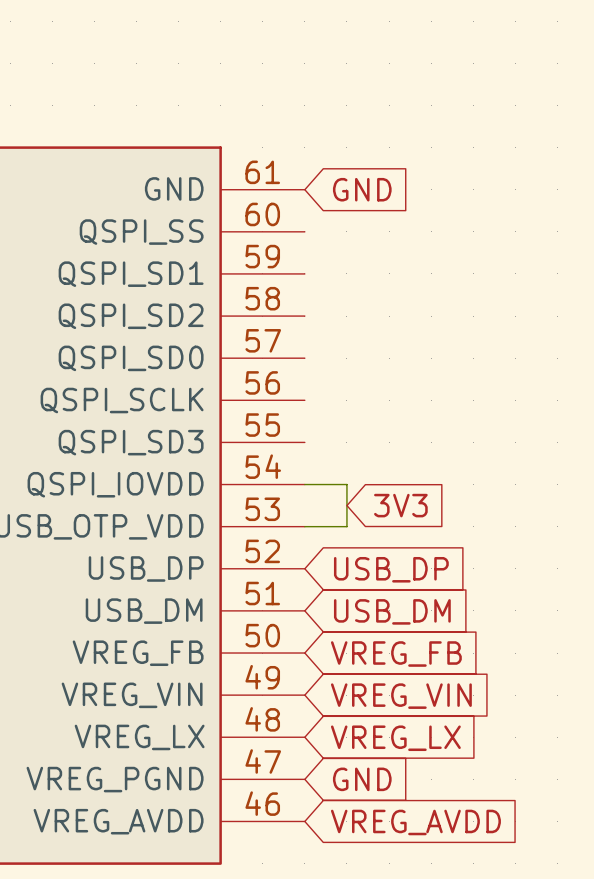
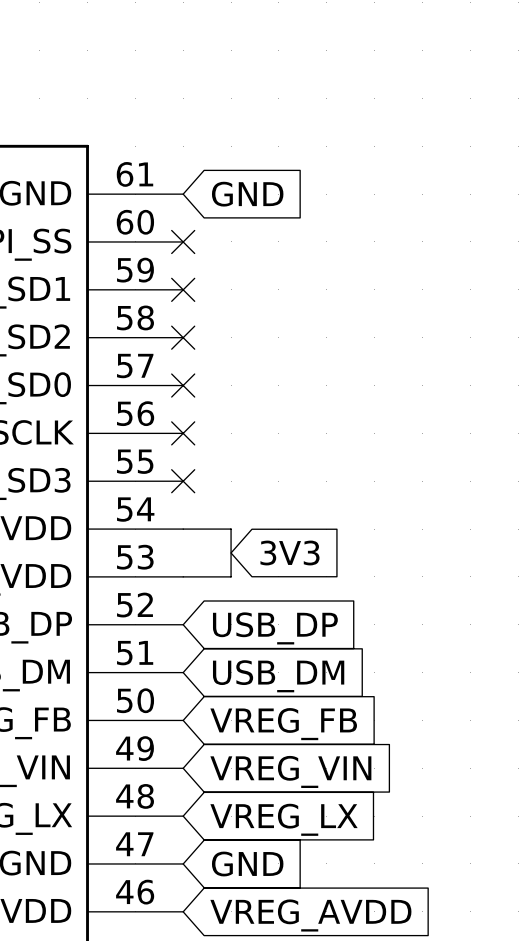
no-connect mark: none -> (183, 241)
no-connect mark: none -> (183, 289)
no-connect mark: none -> (183, 337)
no-connect mark: none -> (183, 385)
no-connect mark: none -> (183, 433)
no-connect mark: none -> (183, 481)

